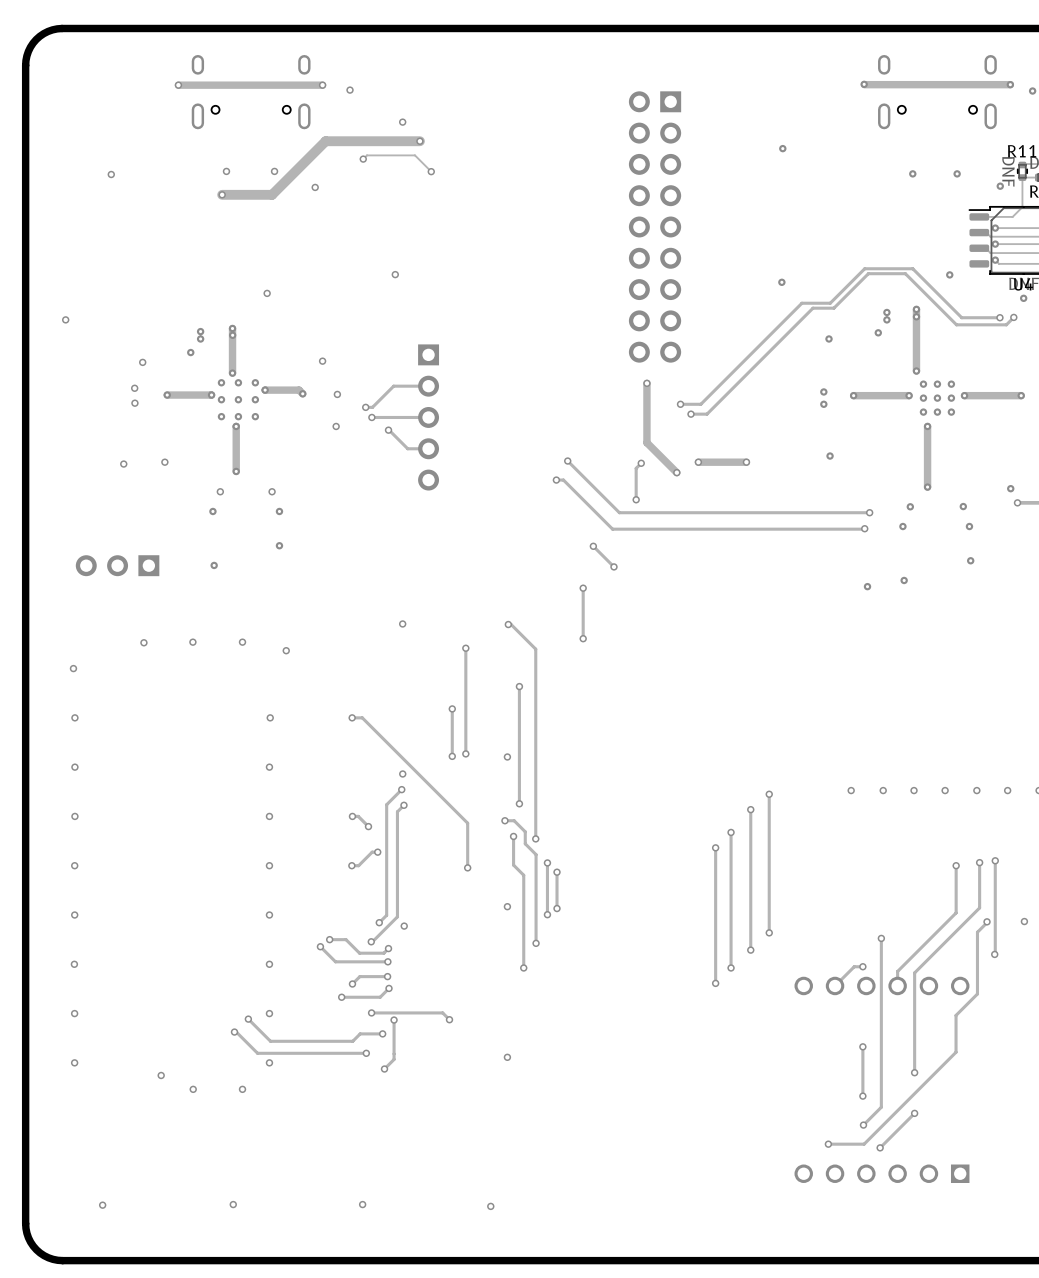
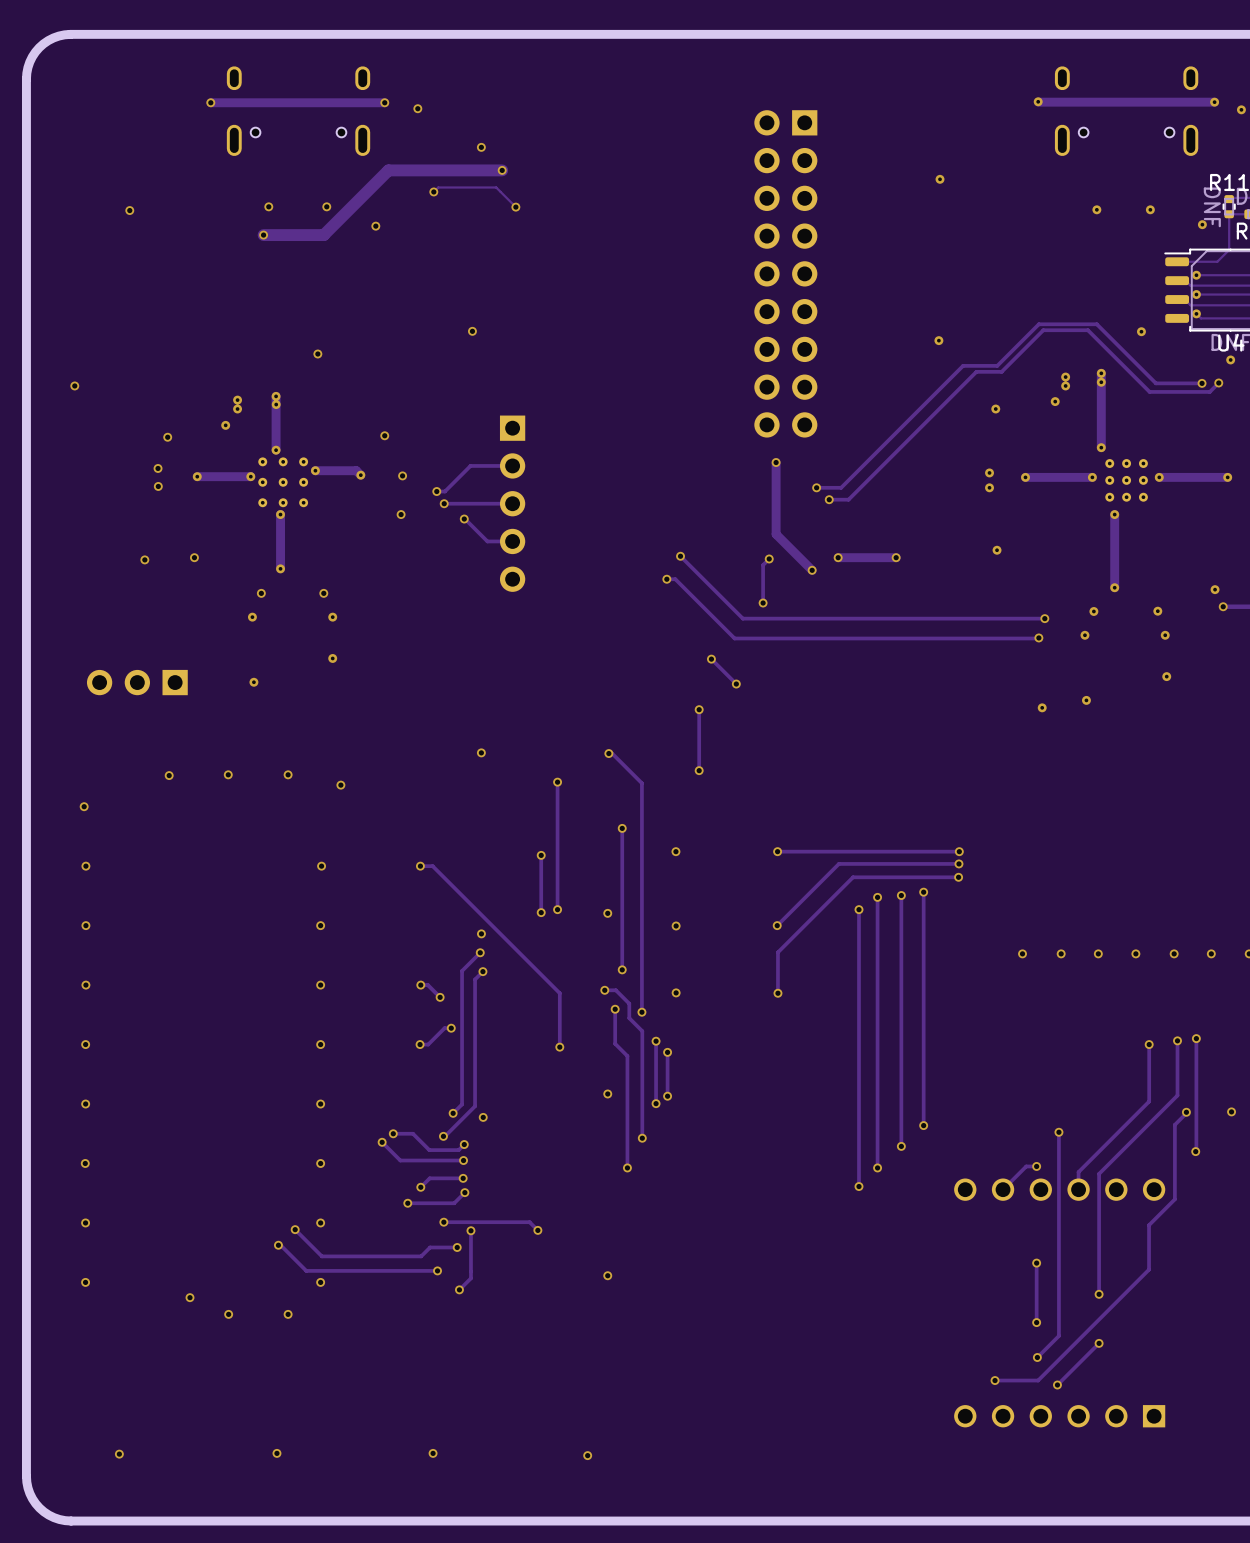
via: none -> (675, 851)
via: none -> (777, 851)
track: none -> (959, 851) (777, 851)
via: none -> (959, 851)
track: none -> (958, 863) (838, 863) (777, 925)
via: none -> (958, 863)
track: none -> (958, 877) (853, 877) (777, 952) (777, 993)
via: none -> (958, 877)
track: none -> (923, 892) (923, 958)
via: none -> (923, 892)
track: none -> (901, 895) (901, 976)
via: none -> (901, 895)
track: none -> (877, 897) (877, 1004)
via: none -> (877, 897)
track: none -> (858, 909) (858, 1023)
via: none -> (858, 909)
via: none -> (676, 925)
via: none -> (777, 925)
via: (769, 794) -> none
via: (750, 809) -> none
via: none -> (676, 992)
via: none -> (777, 993)
via: (731, 832) -> none
via: (715, 847) -> none

